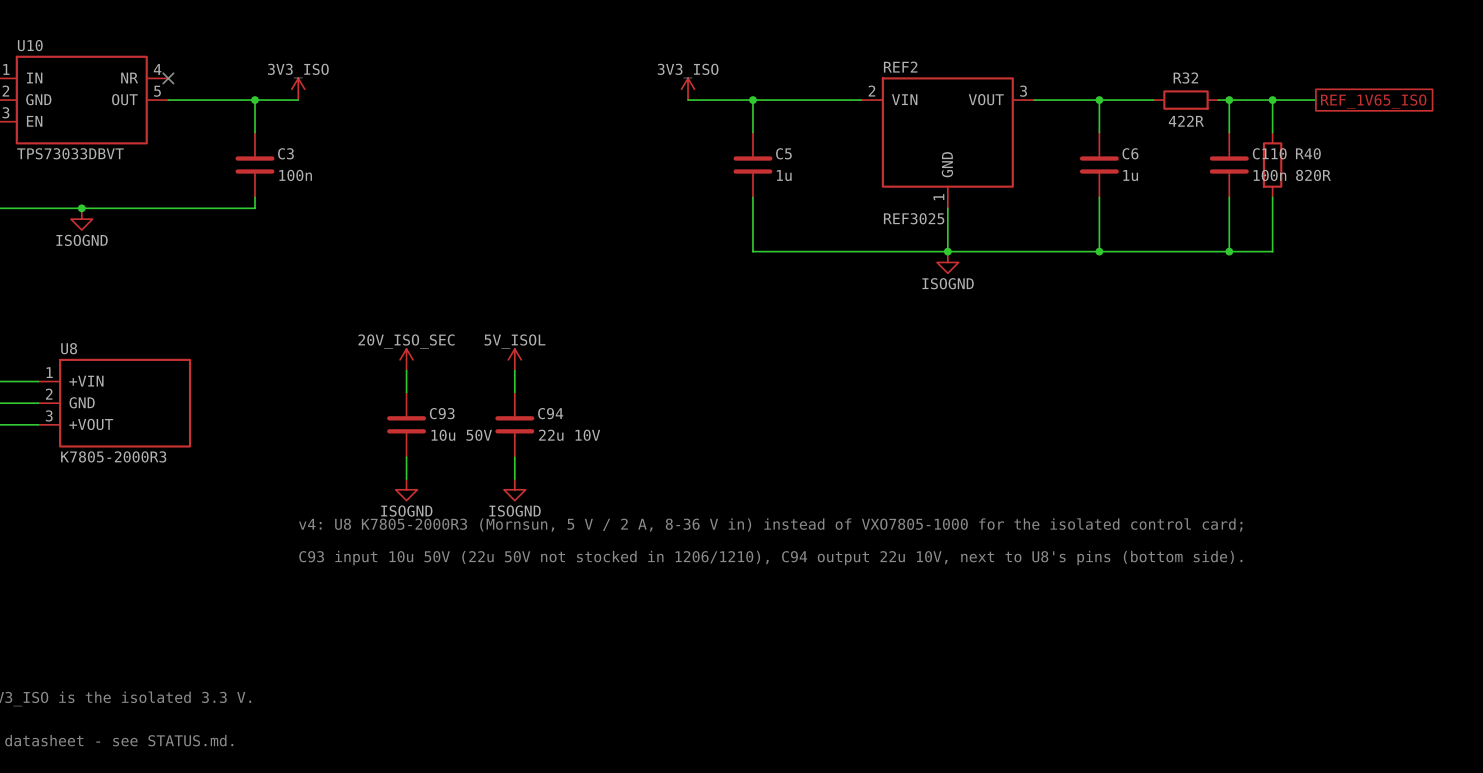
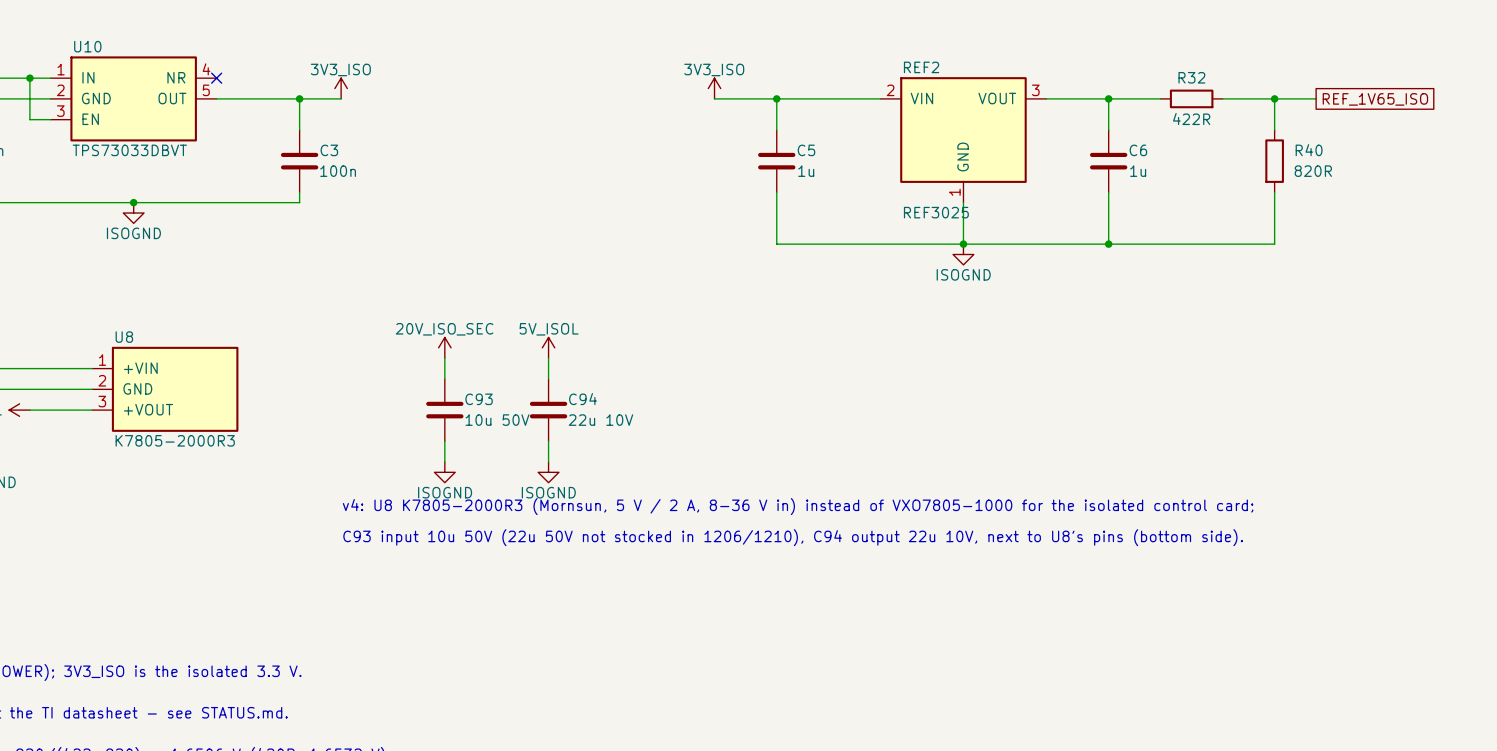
wire: (1229, 100) (1229, 132) -> none
junction: (1229, 100) -> none
C110: 100n (1229, 165) -> none
wire: (1229, 197) (1229, 251) -> none
junction: (1229, 251) -> none

